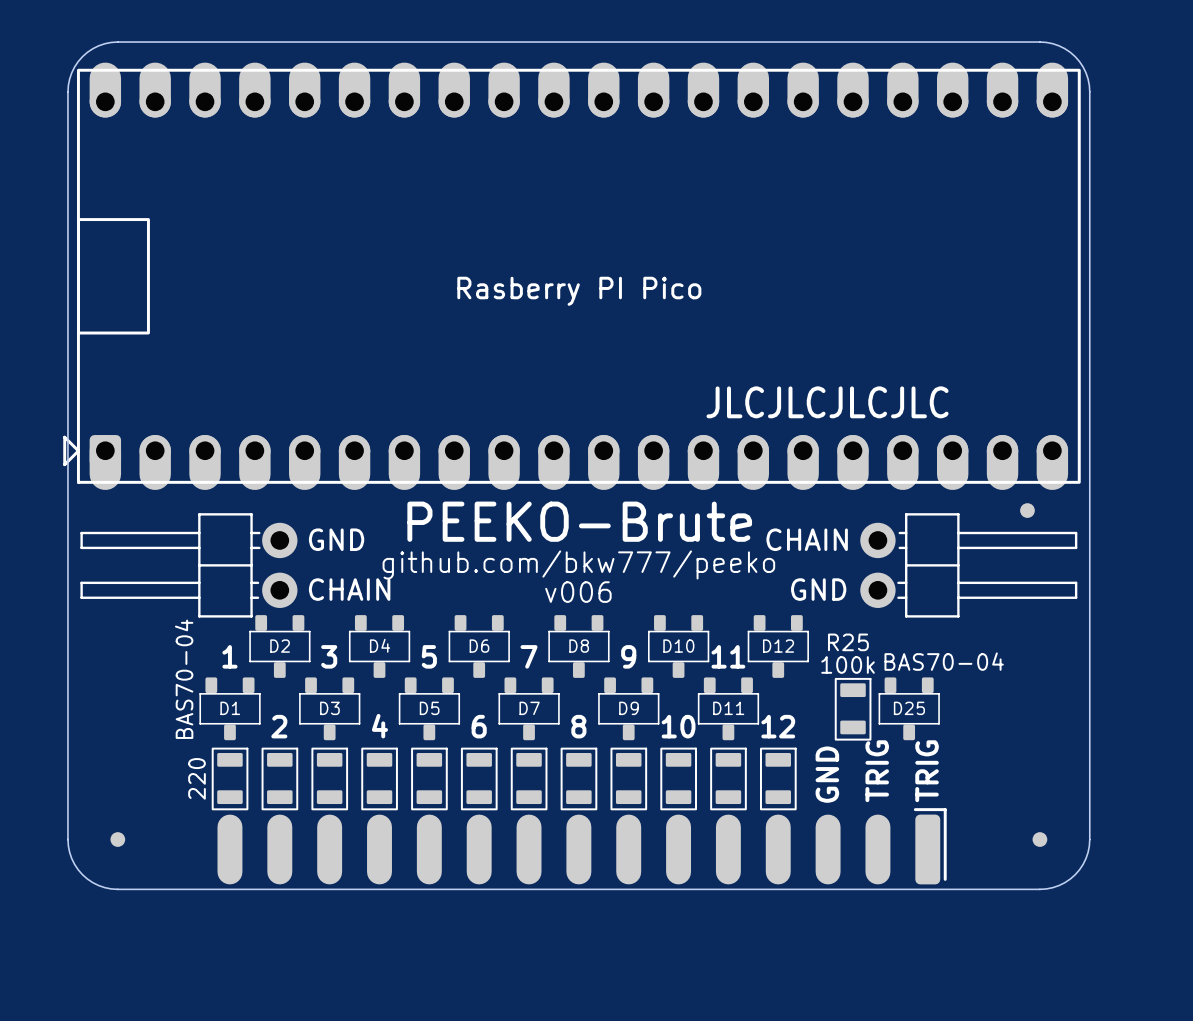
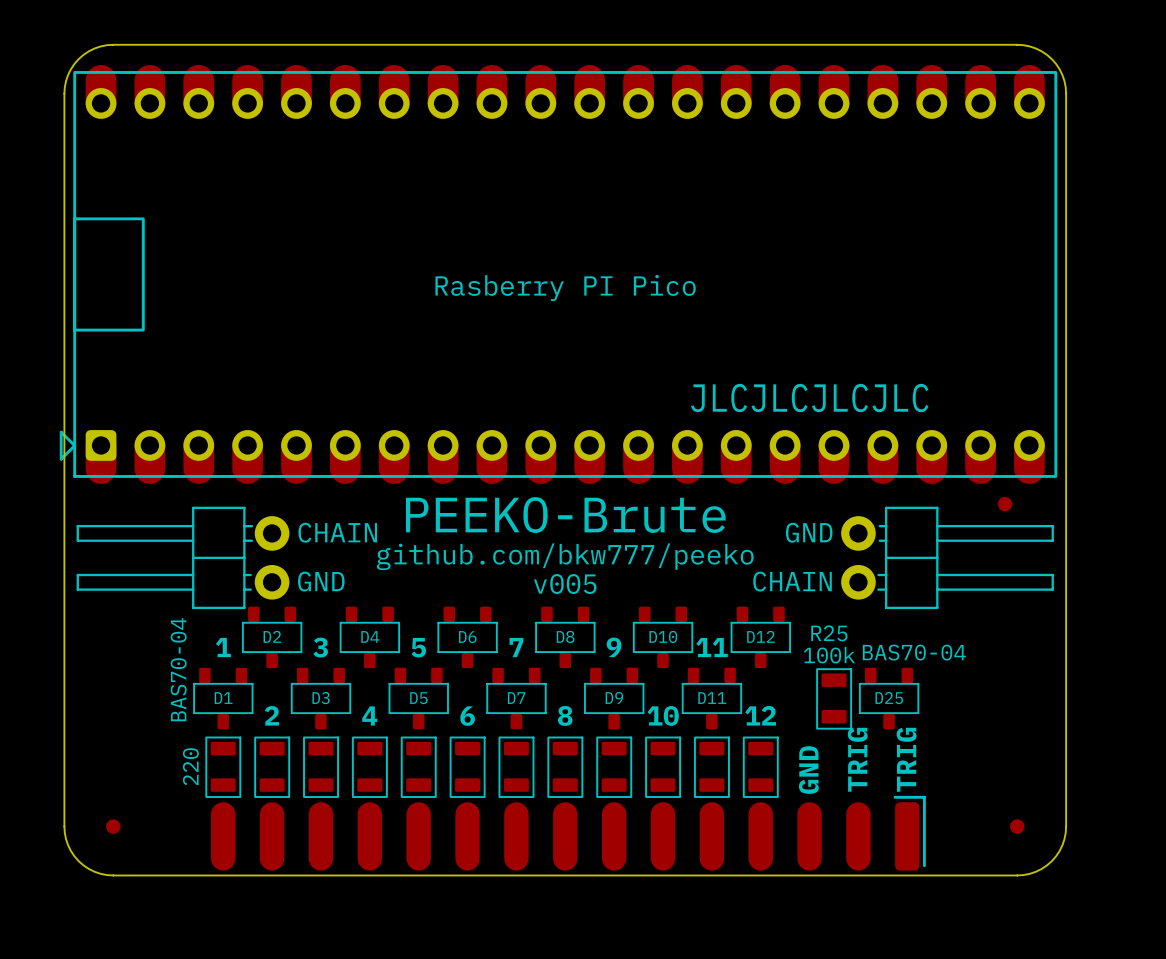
text: GND (336, 539) -> CHAIN (337, 532)
text: CHAIN (807, 539) -> GND (809, 532)
text: CHAIN (349, 589) -> GND (321, 581)
text: GND (818, 589) -> CHAIN (792, 581)
text: v006 (578, 592) -> v005 (565, 584)

